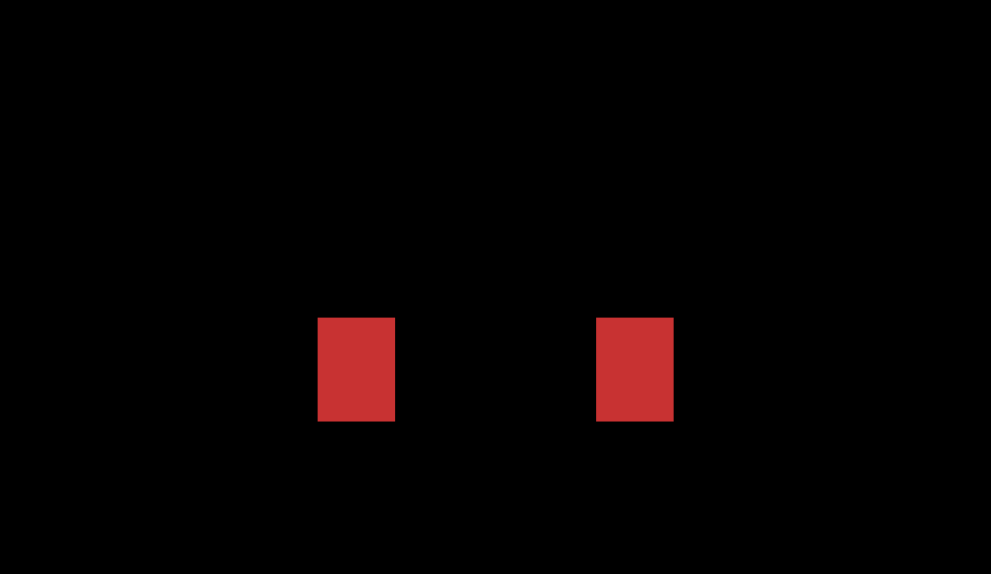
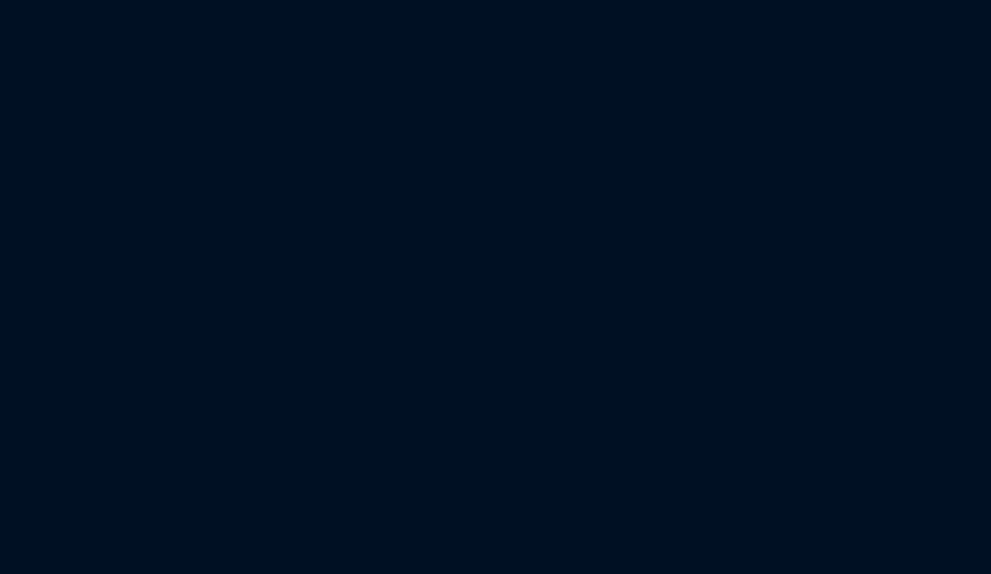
part: (495, 369) -> none

